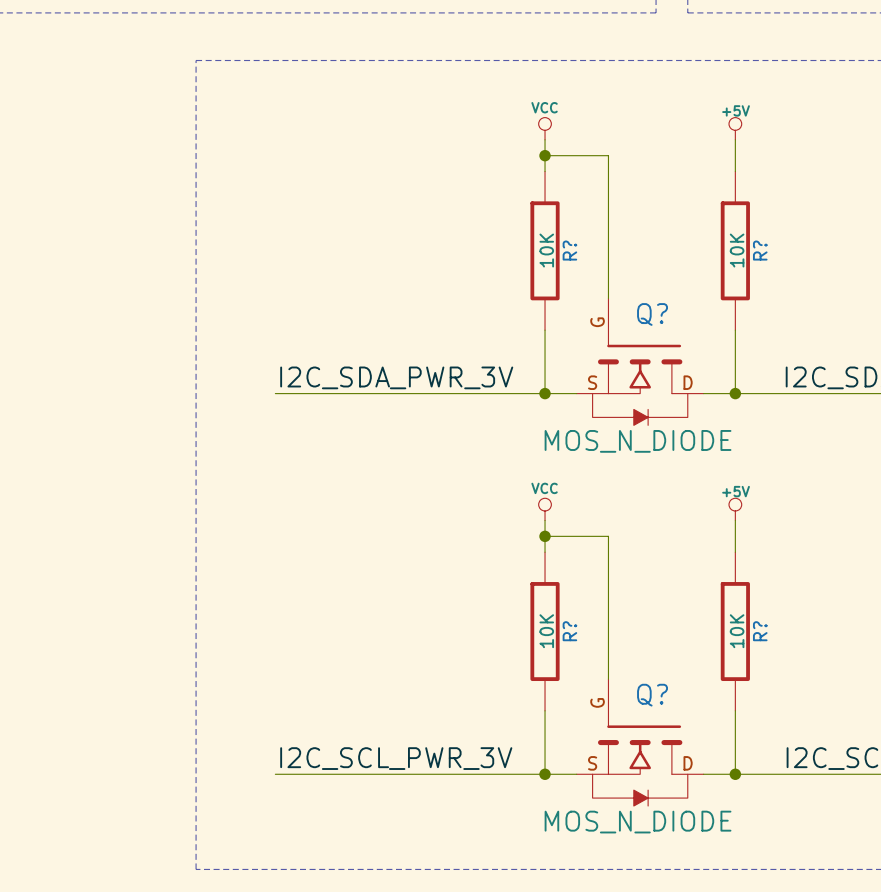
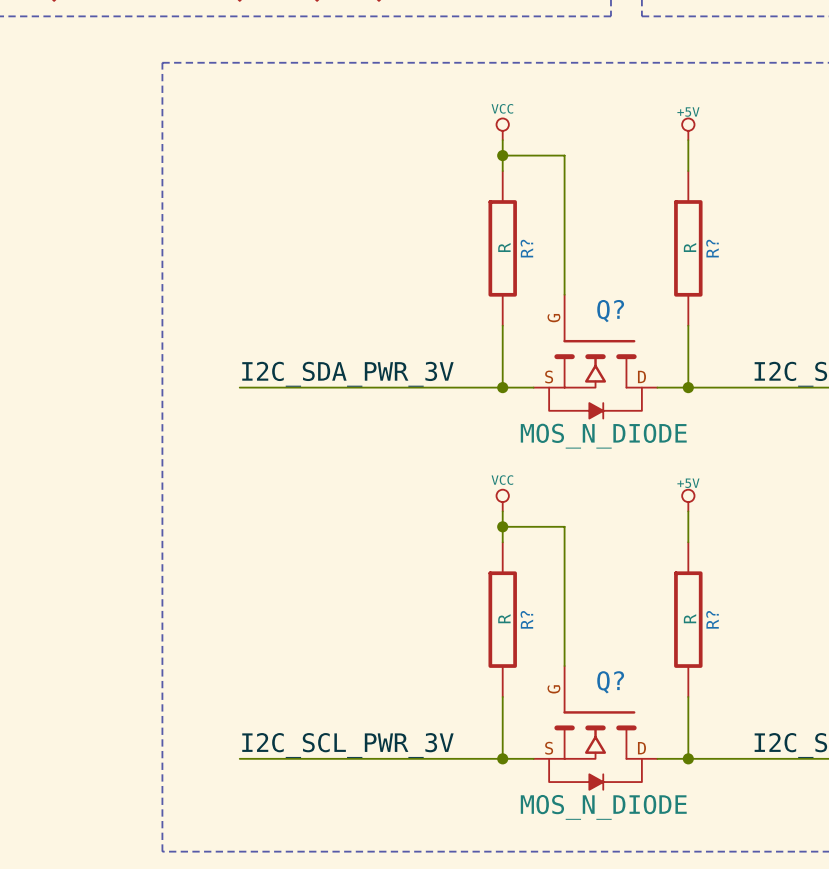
R? value: 10K (546, 250) -> R (504, 247)
R? value: 10K (737, 250) -> R (690, 247)
R? value: 10K (546, 631) -> R (504, 618)
R? value: 10K (737, 631) -> R (690, 618)

